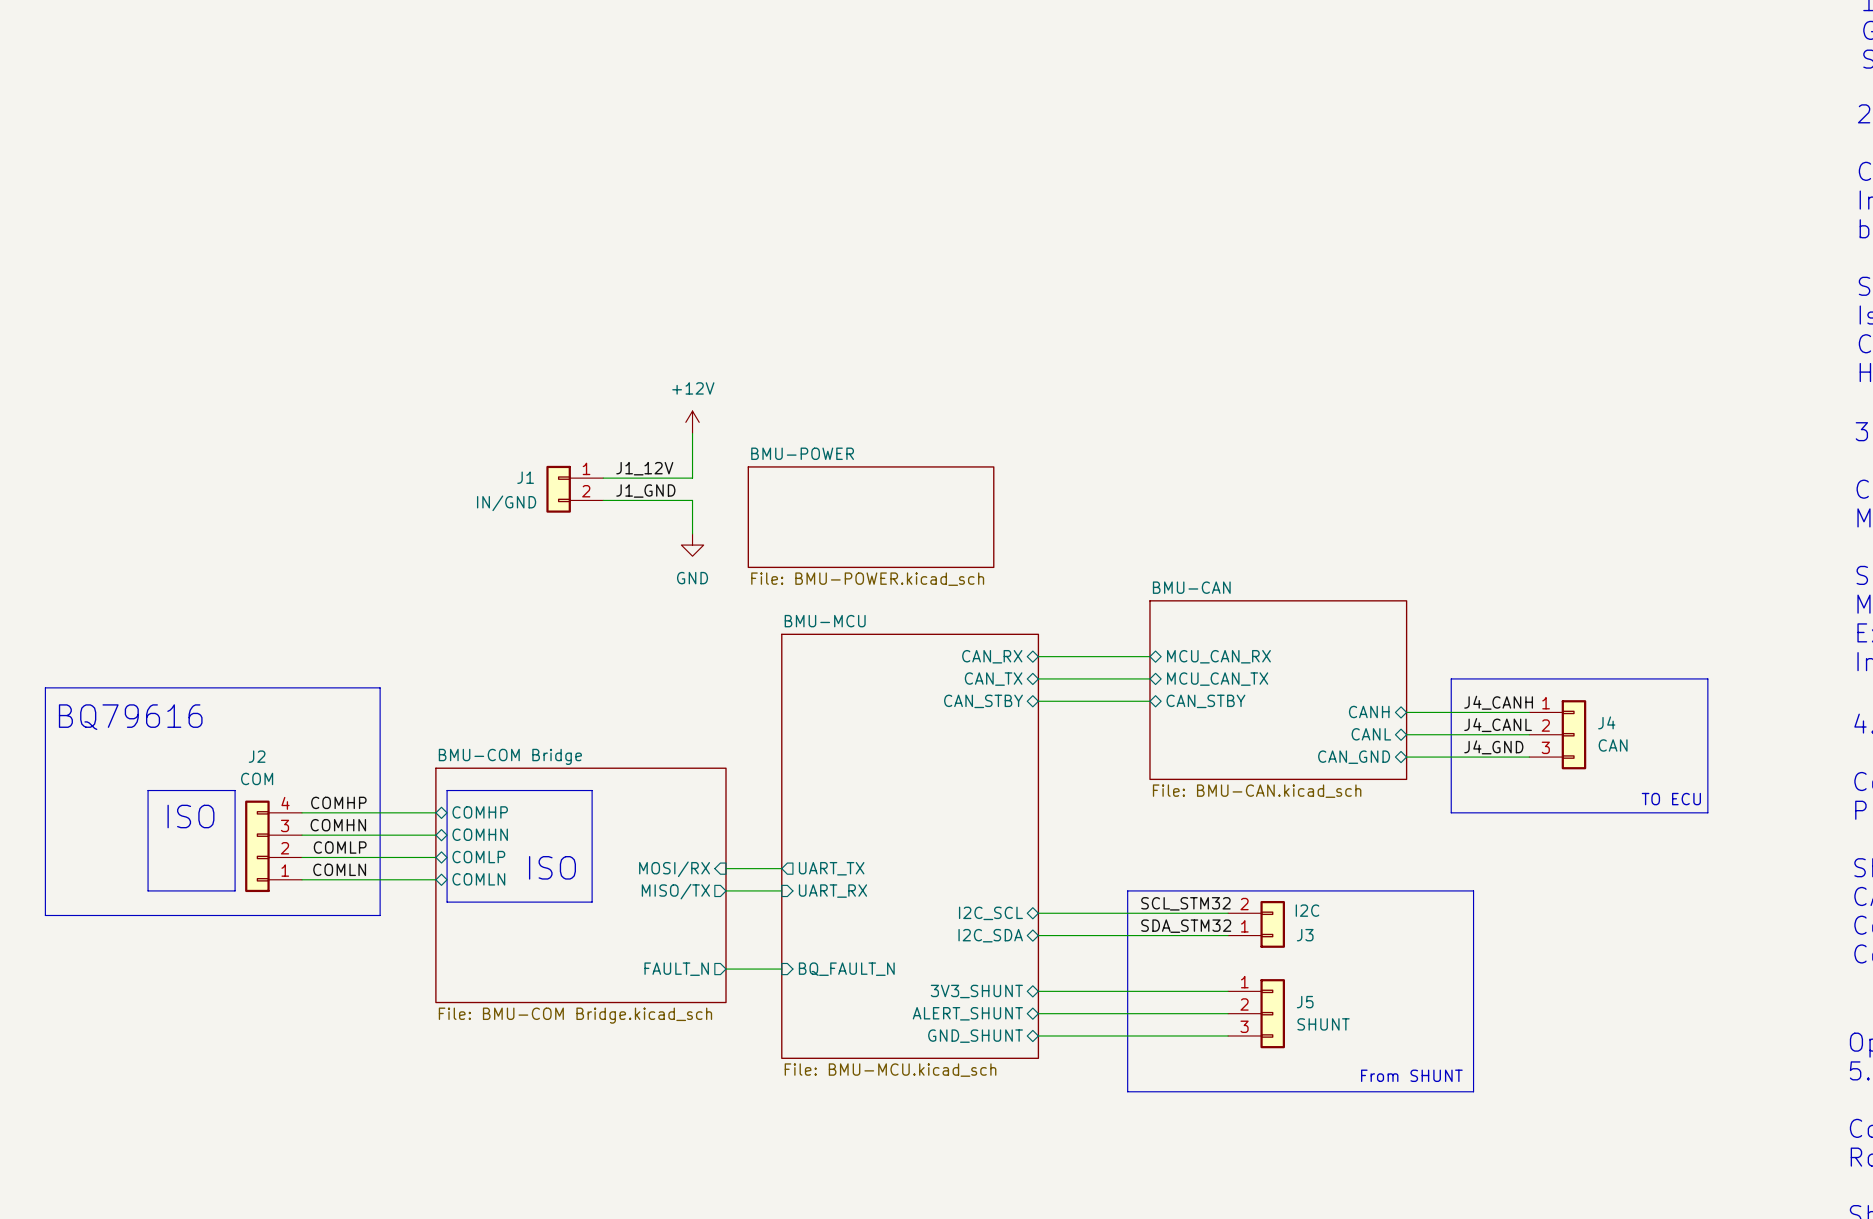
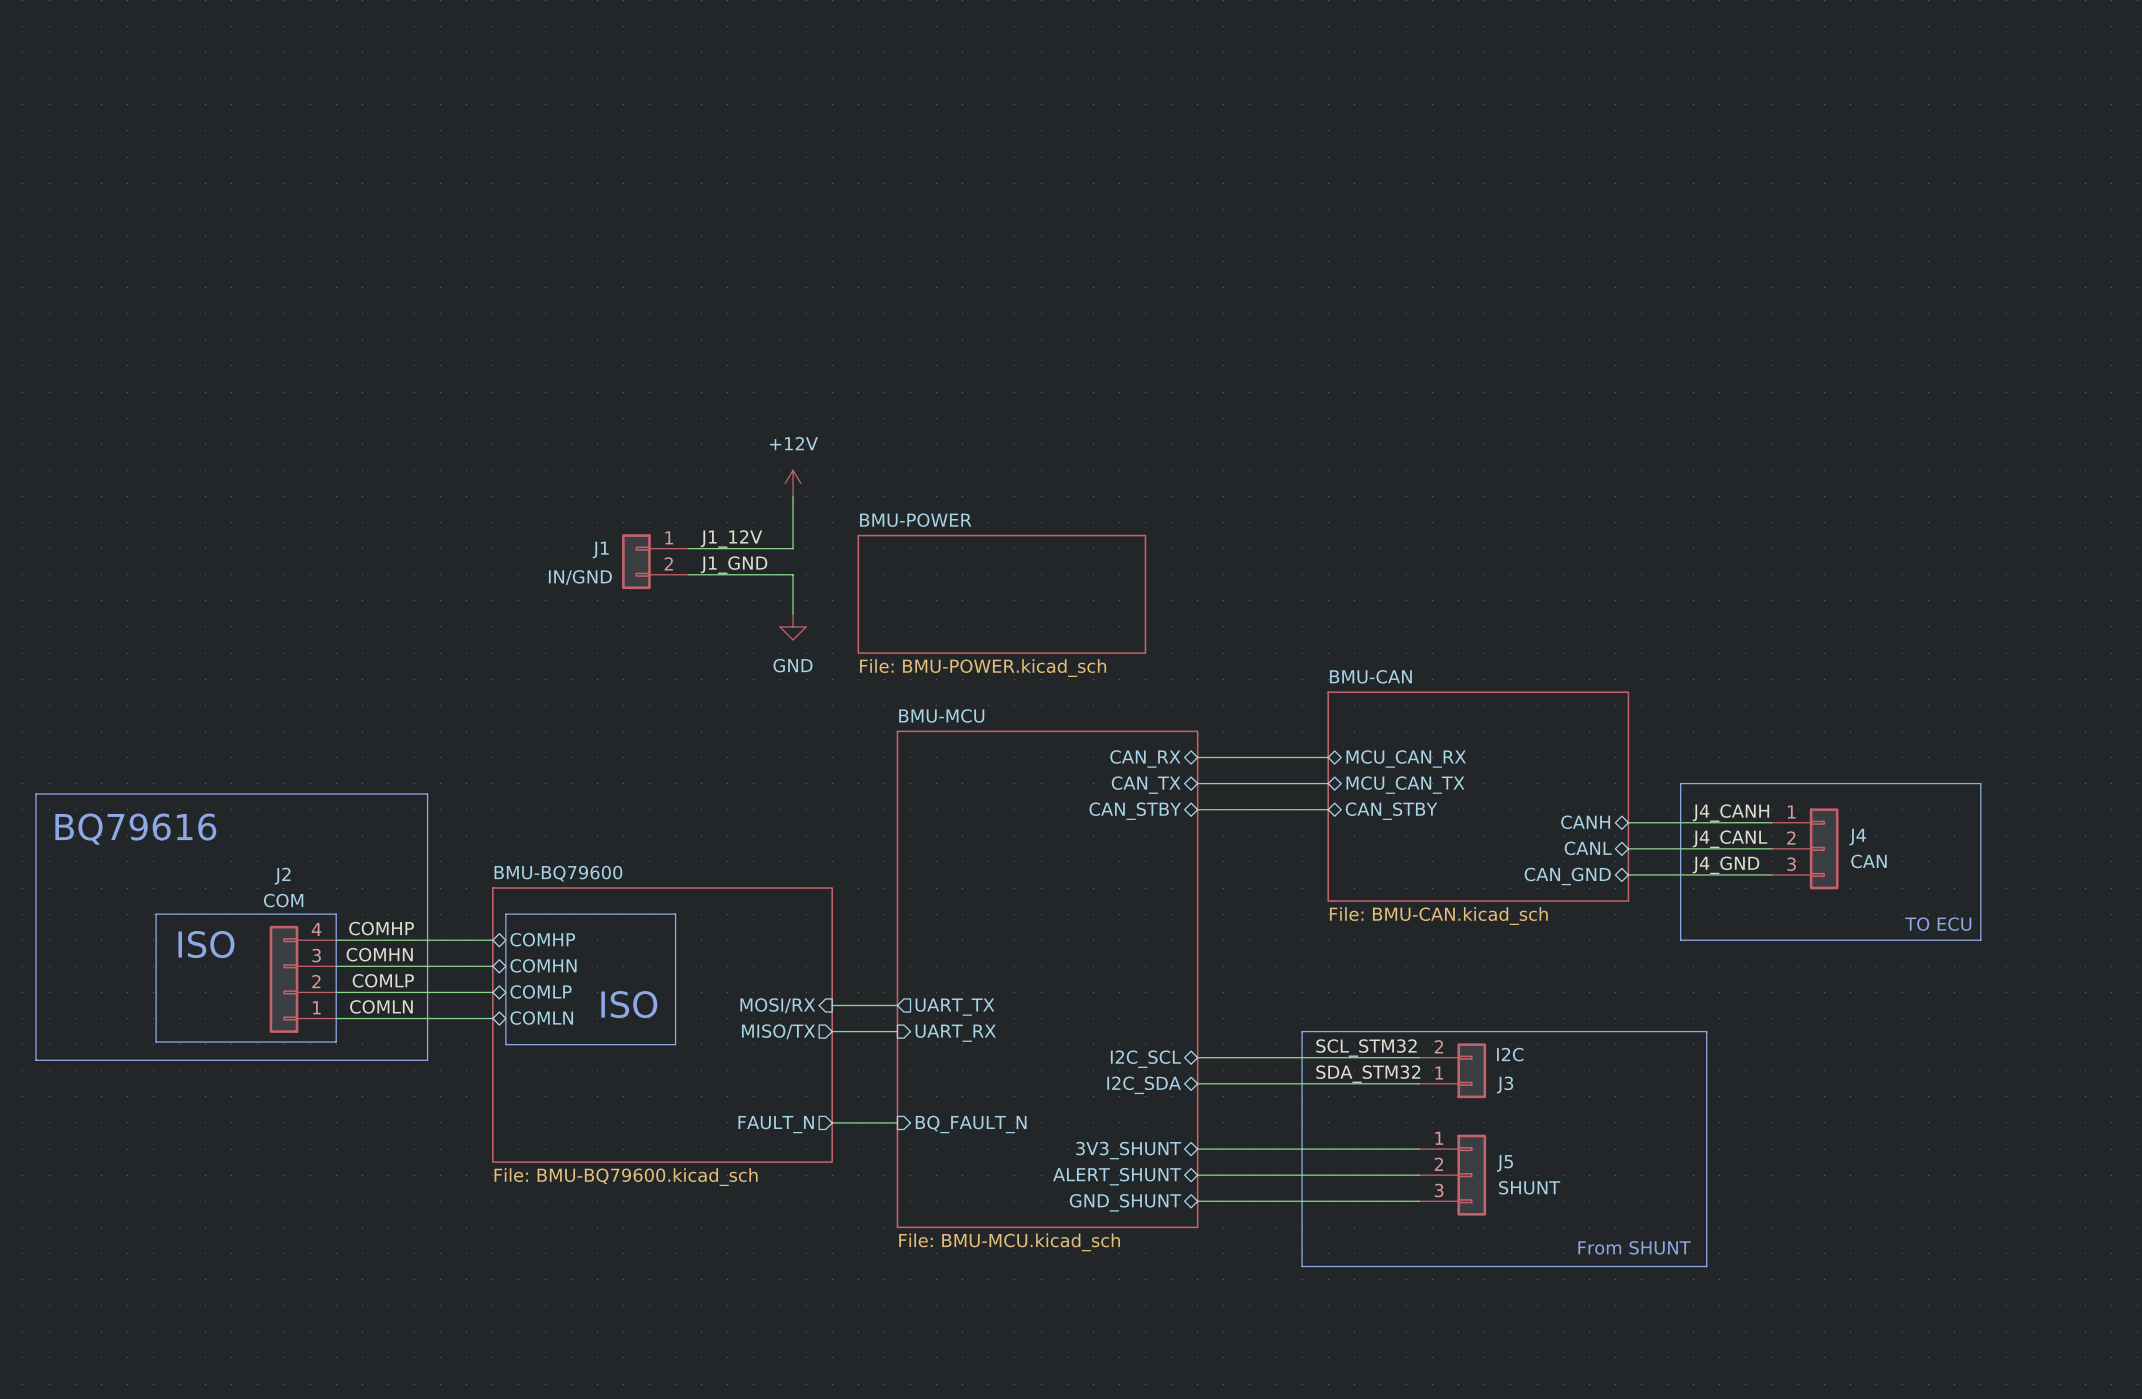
sheet BMU-COM Bridge name: BMU-COM Bridge (510, 756) -> BMU-BQ79600 (558, 873)
line: (235, 790) (235, 890) (148, 890) -> (257, 914) (336, 914) (336, 1042) (156, 1042) (156, 1031)
sheet BMU-COM Bridge value: File: BMU-COM Bridge.kicad_sch (575, 1015) -> File: BMU-BQ79600.kicad_sch (626, 1177)

